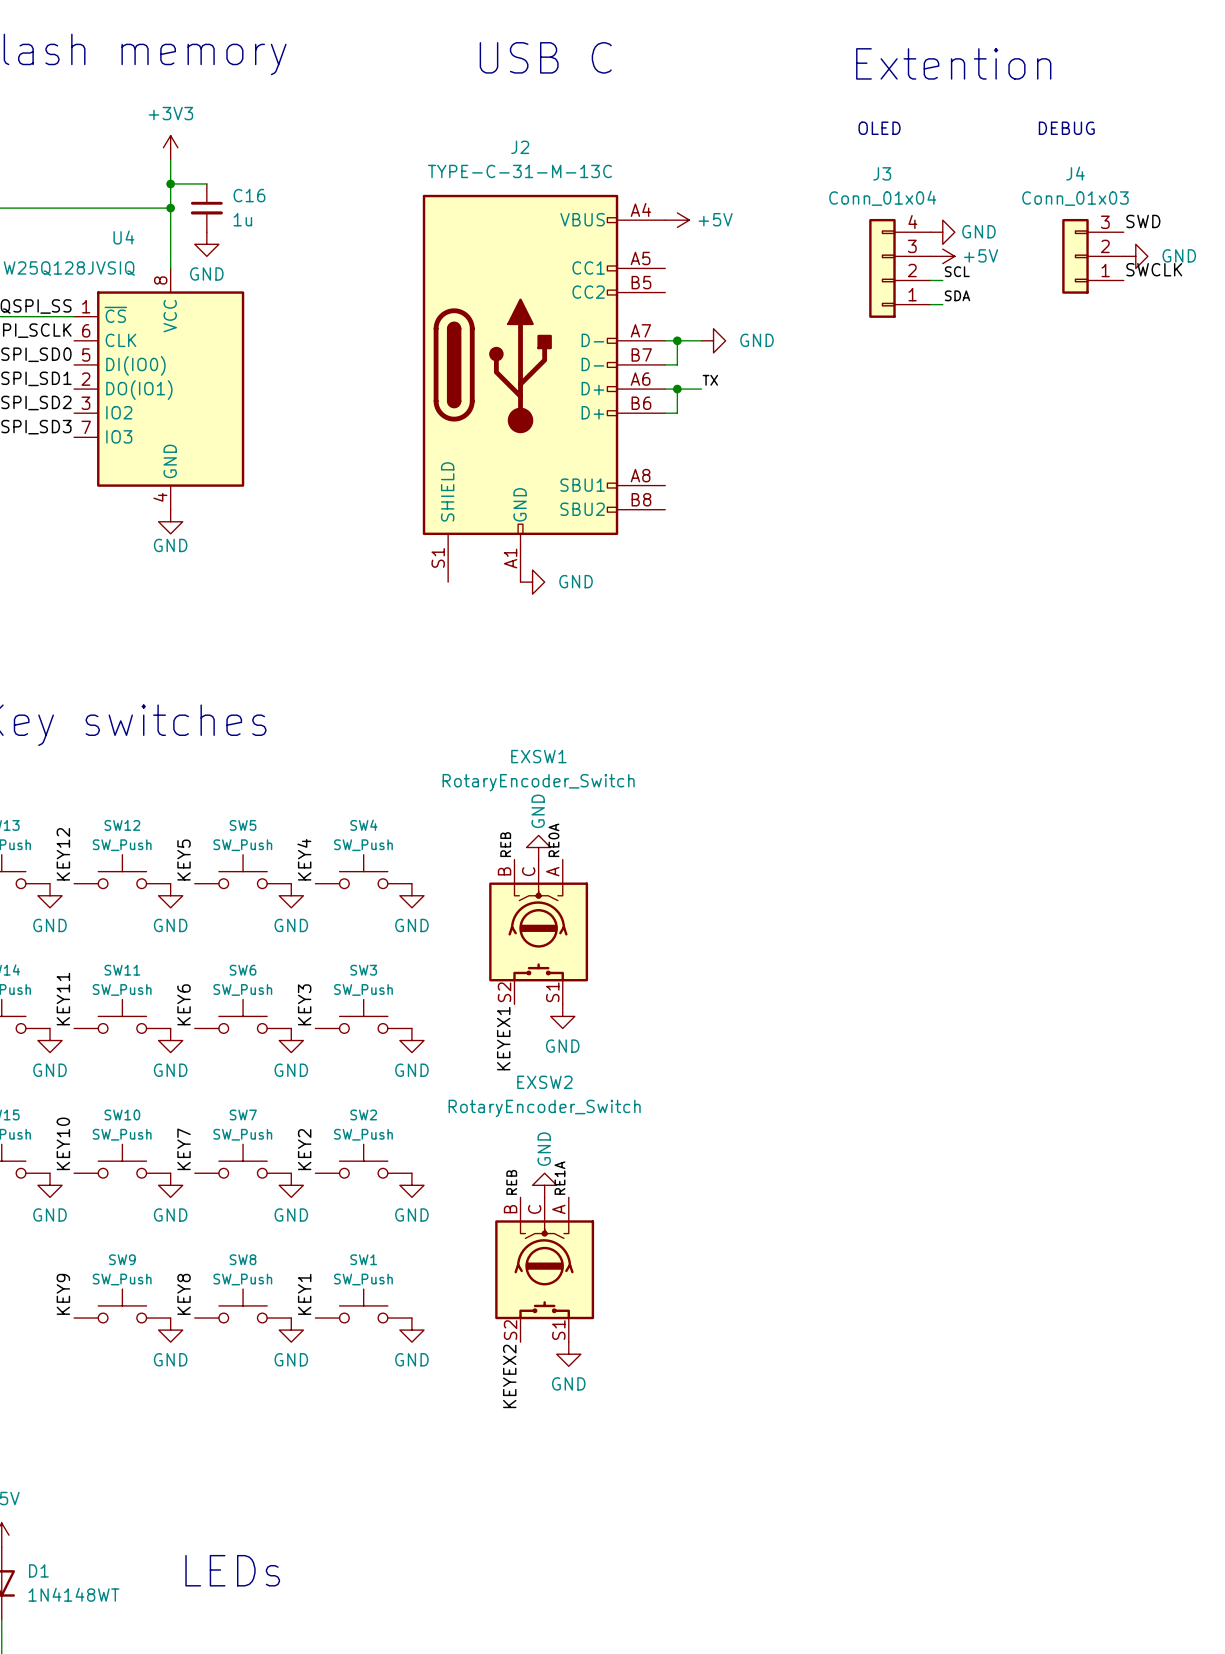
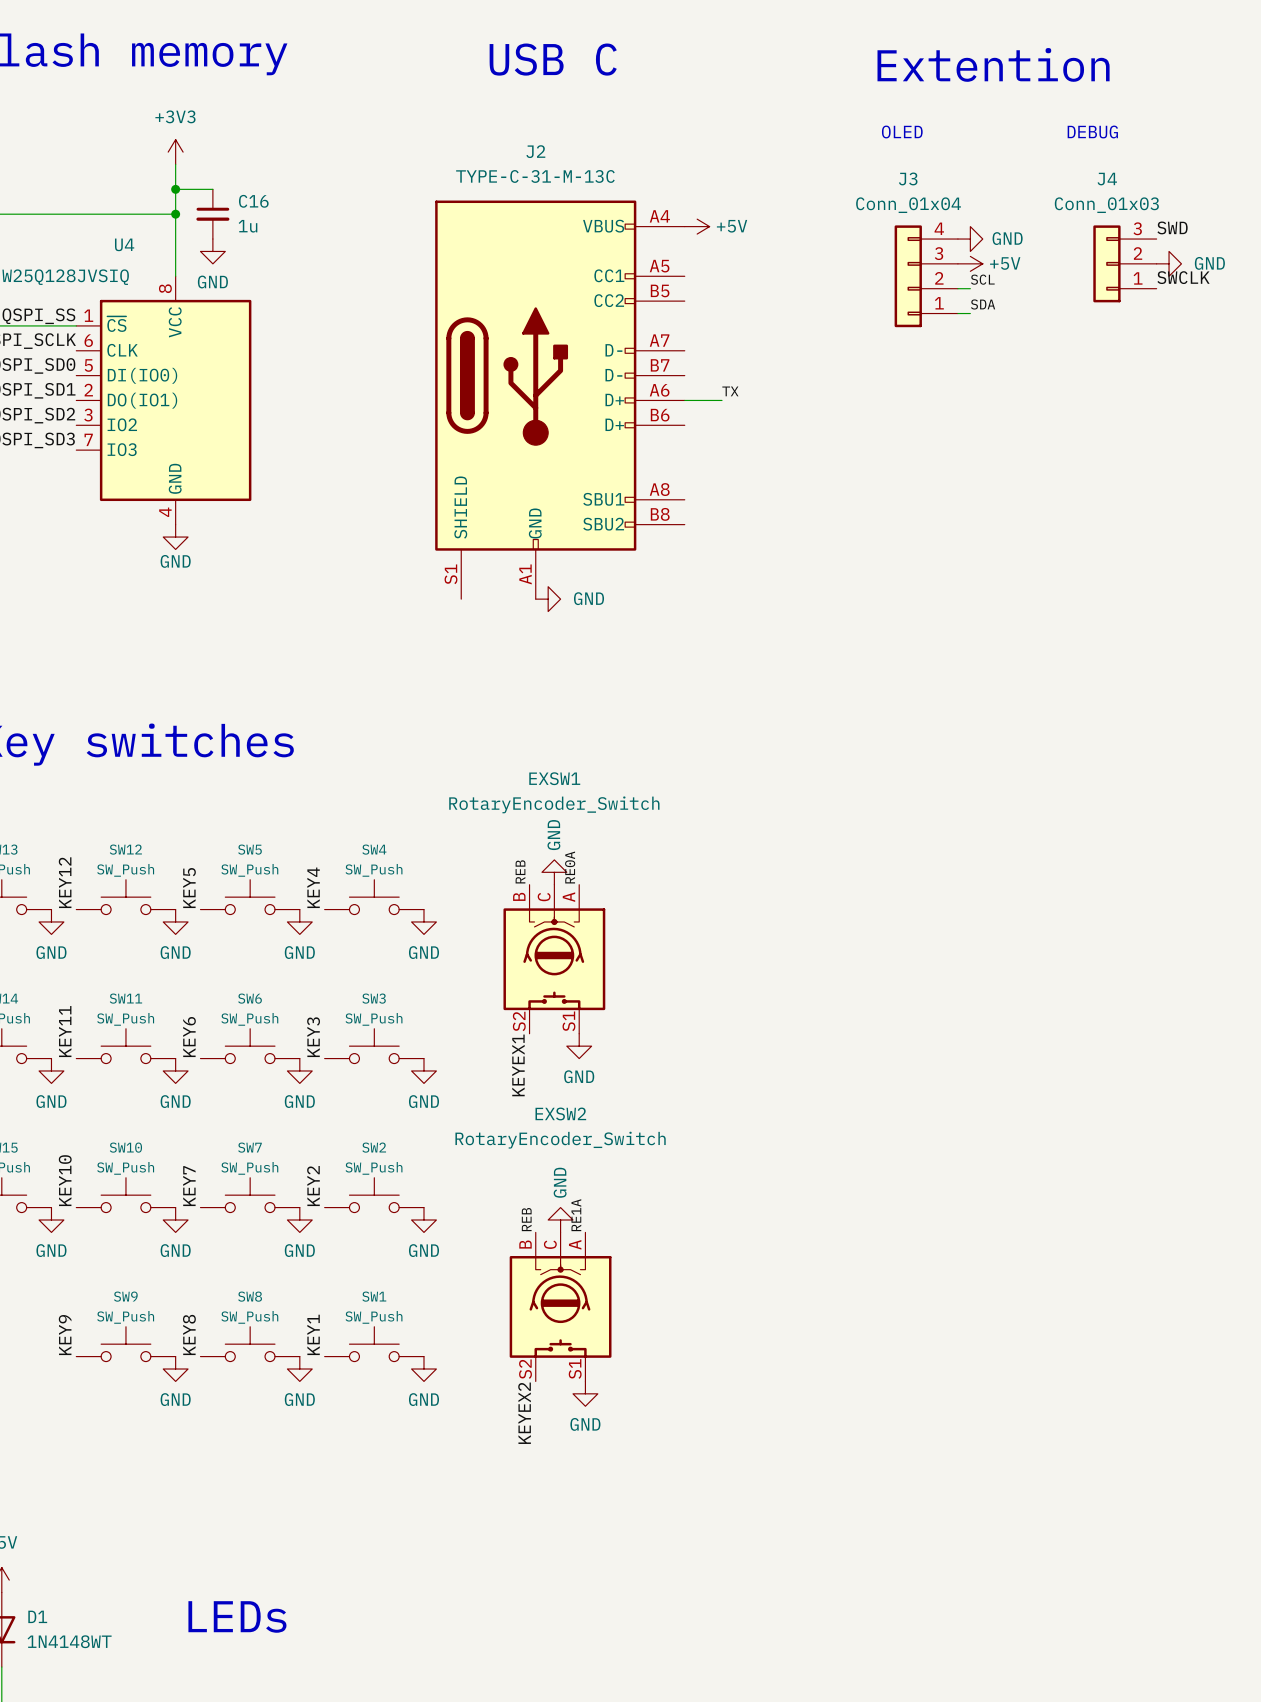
wire: (665, 340) (701, 340) -> none
wire: (677, 340) (677, 364) (665, 364) -> none
junction: (677, 340) -> none
power symbol: GND (713, 340) -> none
wire: (677, 389) (677, 413) (665, 413) -> none
junction: (677, 389) -> none

